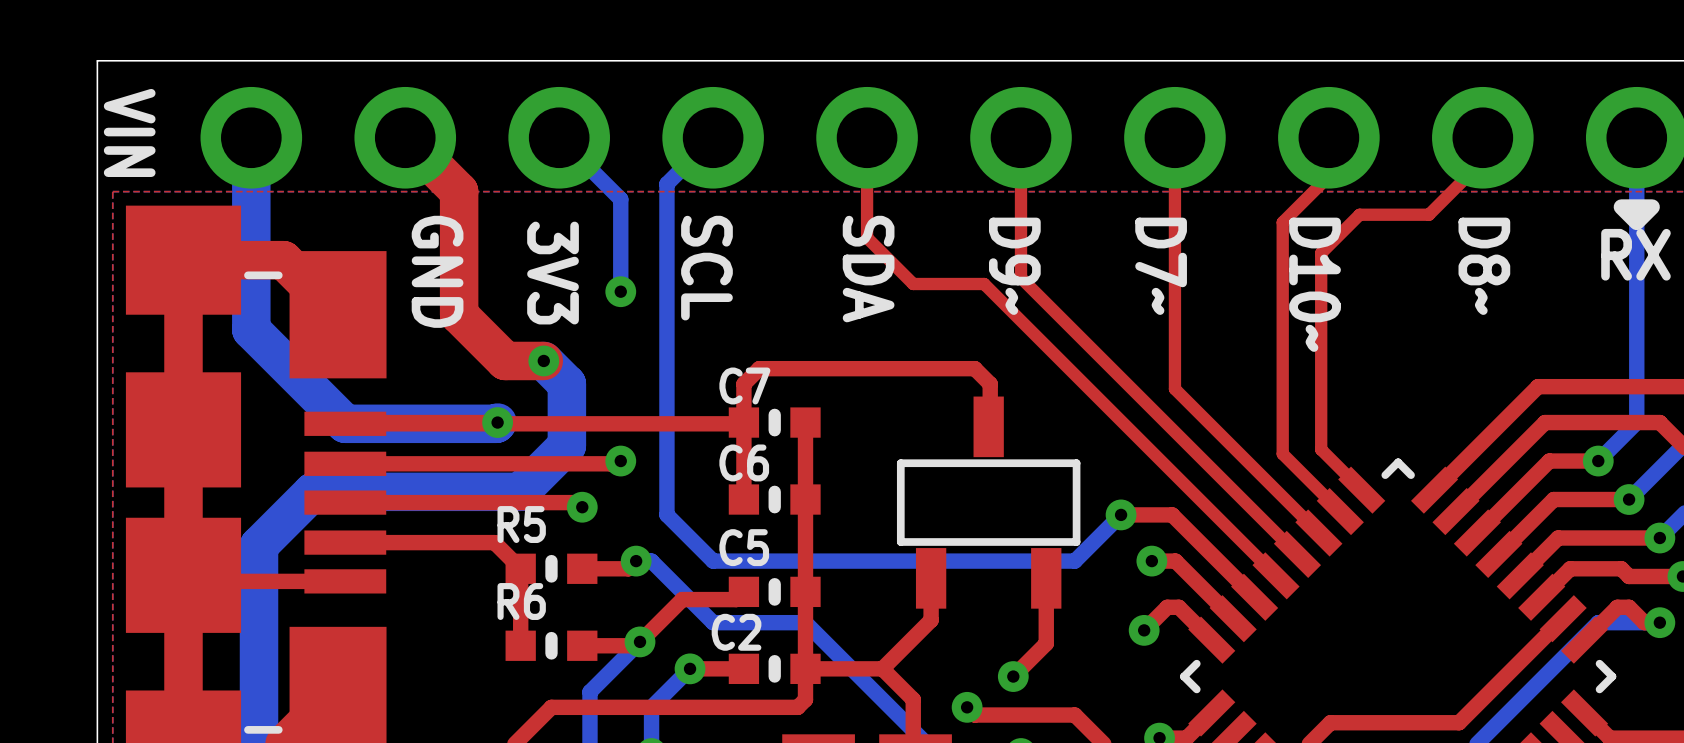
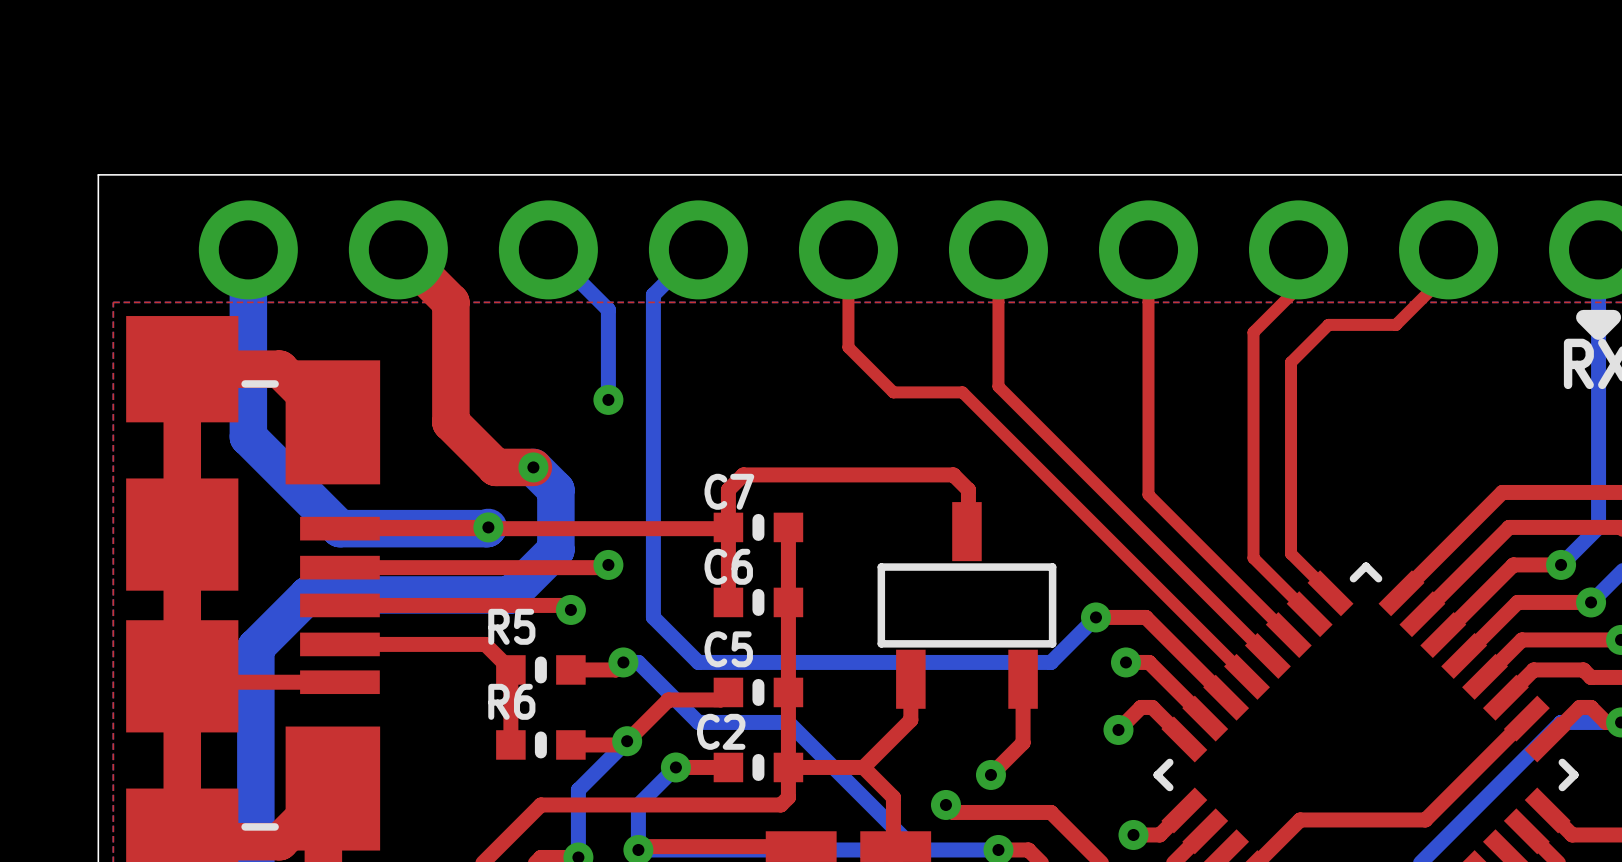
text: VIN (129, 132) -> none
text: D9~ (1014, 266) -> none
text: D7~ (1161, 266) -> none
text: D8~ (1484, 266) -> none
text: SCL (706, 268) -> none
text: SDA (868, 269) -> none
text: GND (437, 271) -> none
text: 3V3 (553, 273) -> none
text: D10~ (1315, 284) -> none

